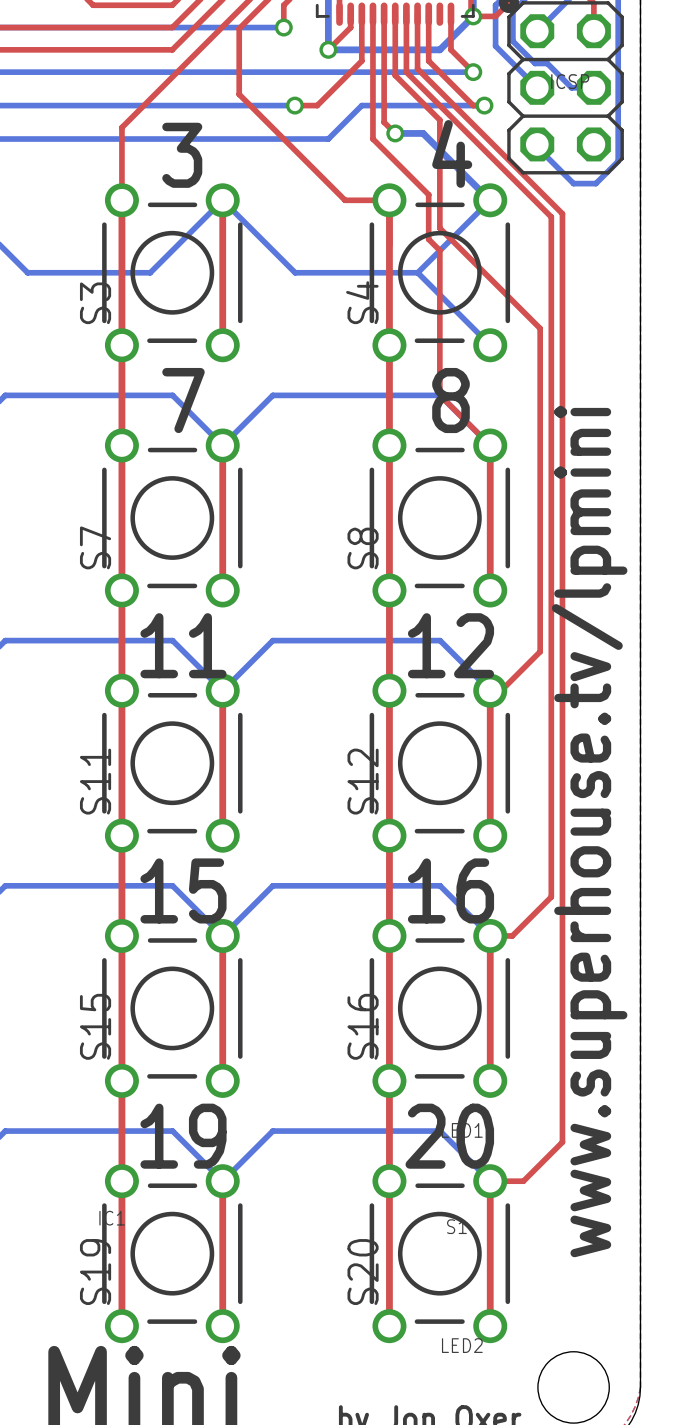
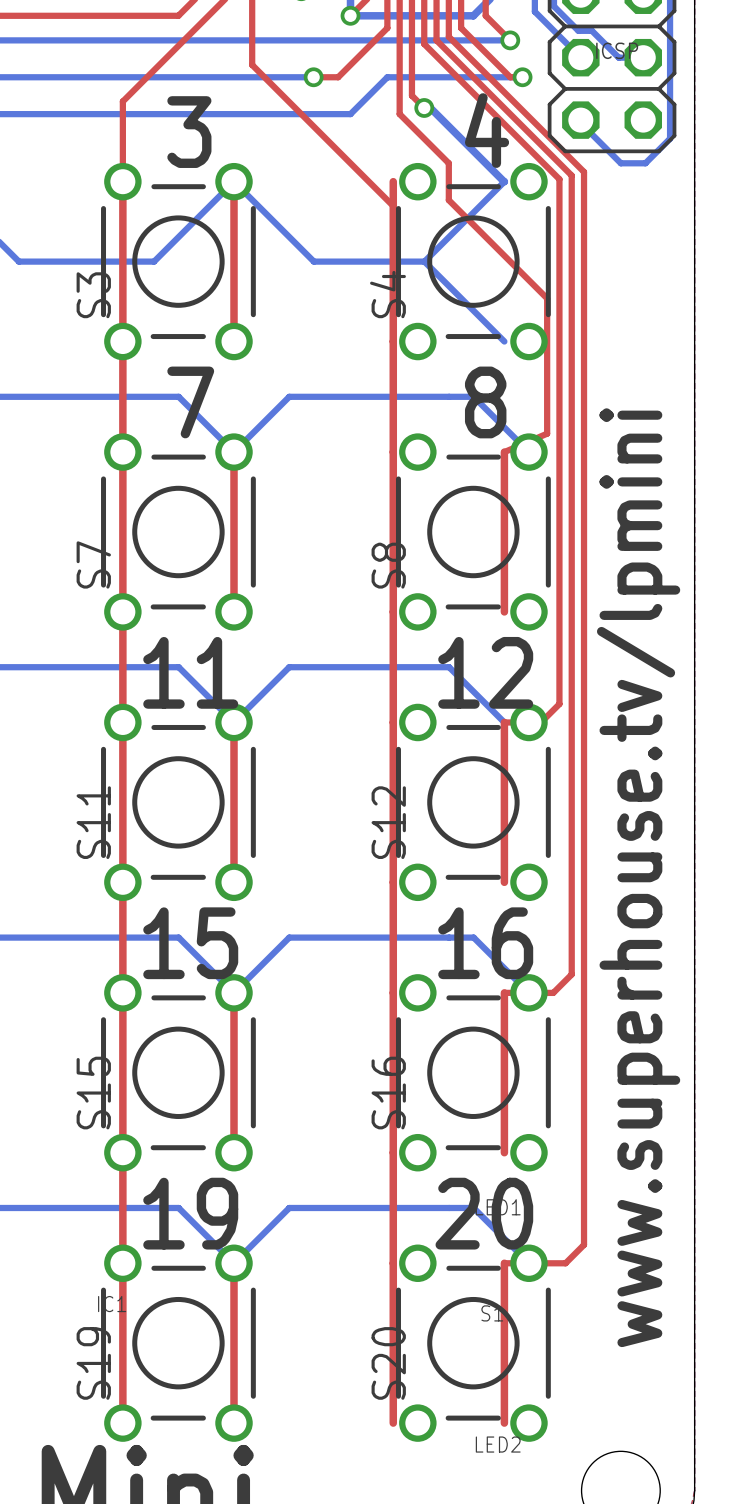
top track: (439, 120) (439, 228) (540, 328) -> (584, 171) (584, 323)
bottom track: (400, 133) (423, 133) (489, 200) -> (430, 107) (504, 181)
top track: (417, 183) (428, 194) (428, 239) (439, 250) (439, 395) (490, 445) (490, 590) -> (448, 163) (448, 200) (547, 298) (547, 433) (504, 452) (504, 611)
top track: (540, 191) (562, 213) (562, 1142) (540, 1164) -> (584, 679) (584, 1244)
top track: (529, 194) (551, 217) (551, 896) (529, 919) -> (571, 175) (571, 974)
top track: (345, 200) (389, 200) -> (368, 181) (393, 206) (393, 181) (393, 1423)
top track: (389, 200) (389, 1326) -> none
bottom track: none -> (504, 181) (424, 261) (504, 341)
bottom track: (490, 200) (417, 272) -> none
bottom track: (395, 272) (417, 272) -> none
bottom track: (417, 272) (490, 345) -> none
bottom track: (417, 640) (440, 640) (490, 690) -> (449, 667) (504, 722)
top track: (540, 651) (517, 674) -> (473, 93) (559, 179) (559, 704)
top track: (490, 690) (490, 835) -> (528, 722) (504, 722) (504, 882)
top track: (490, 935) (490, 1080) -> (528, 992) (504, 992) (504, 1152)
top track: (490, 1181) (490, 1326) -> (528, 1263) (504, 1263) (504, 1423)

